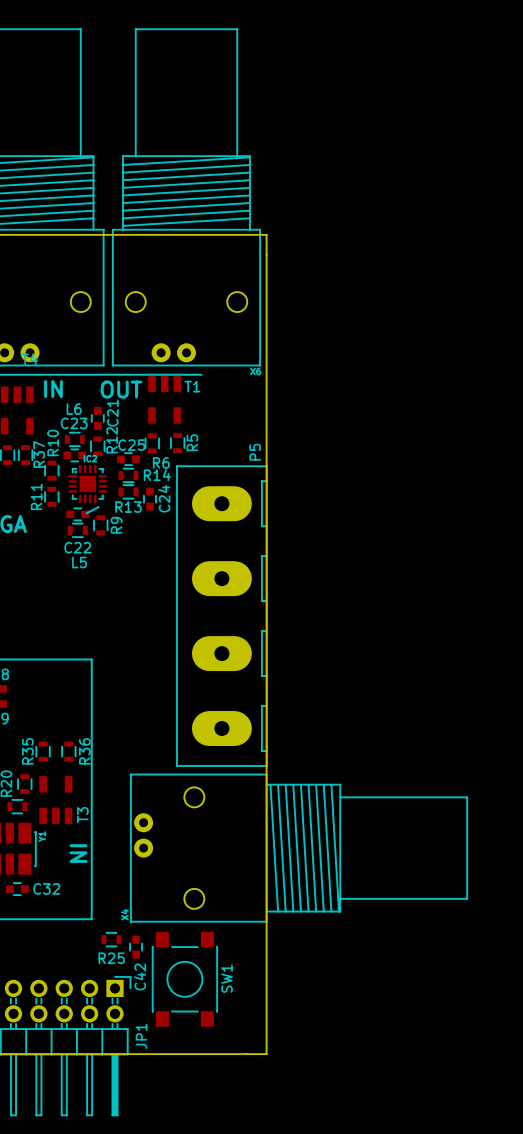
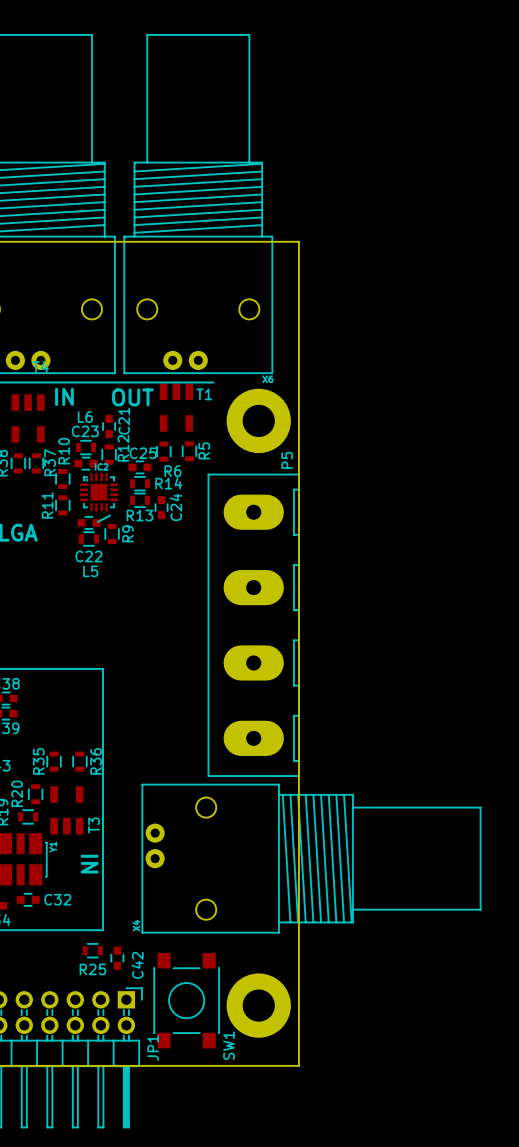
board edge: (266, 234) (266, 1054) -> (278, 241) (298, 241) (298, 1065) (278, 1065)
part: none -> (258, 420)
P5 position: (221, 616) -> (253, 625)
R25 position: (111, 939) -> (92, 950)
C42 position: (136, 947) -> (117, 958)
C42 name position: C42 (140, 976) -> C42 (137, 965)
SW1 name position: SW1 (226, 978) -> SW1 (228, 1045)
SW1 position: (184, 979) -> (186, 1000)
part: none -> (258, 1005)

